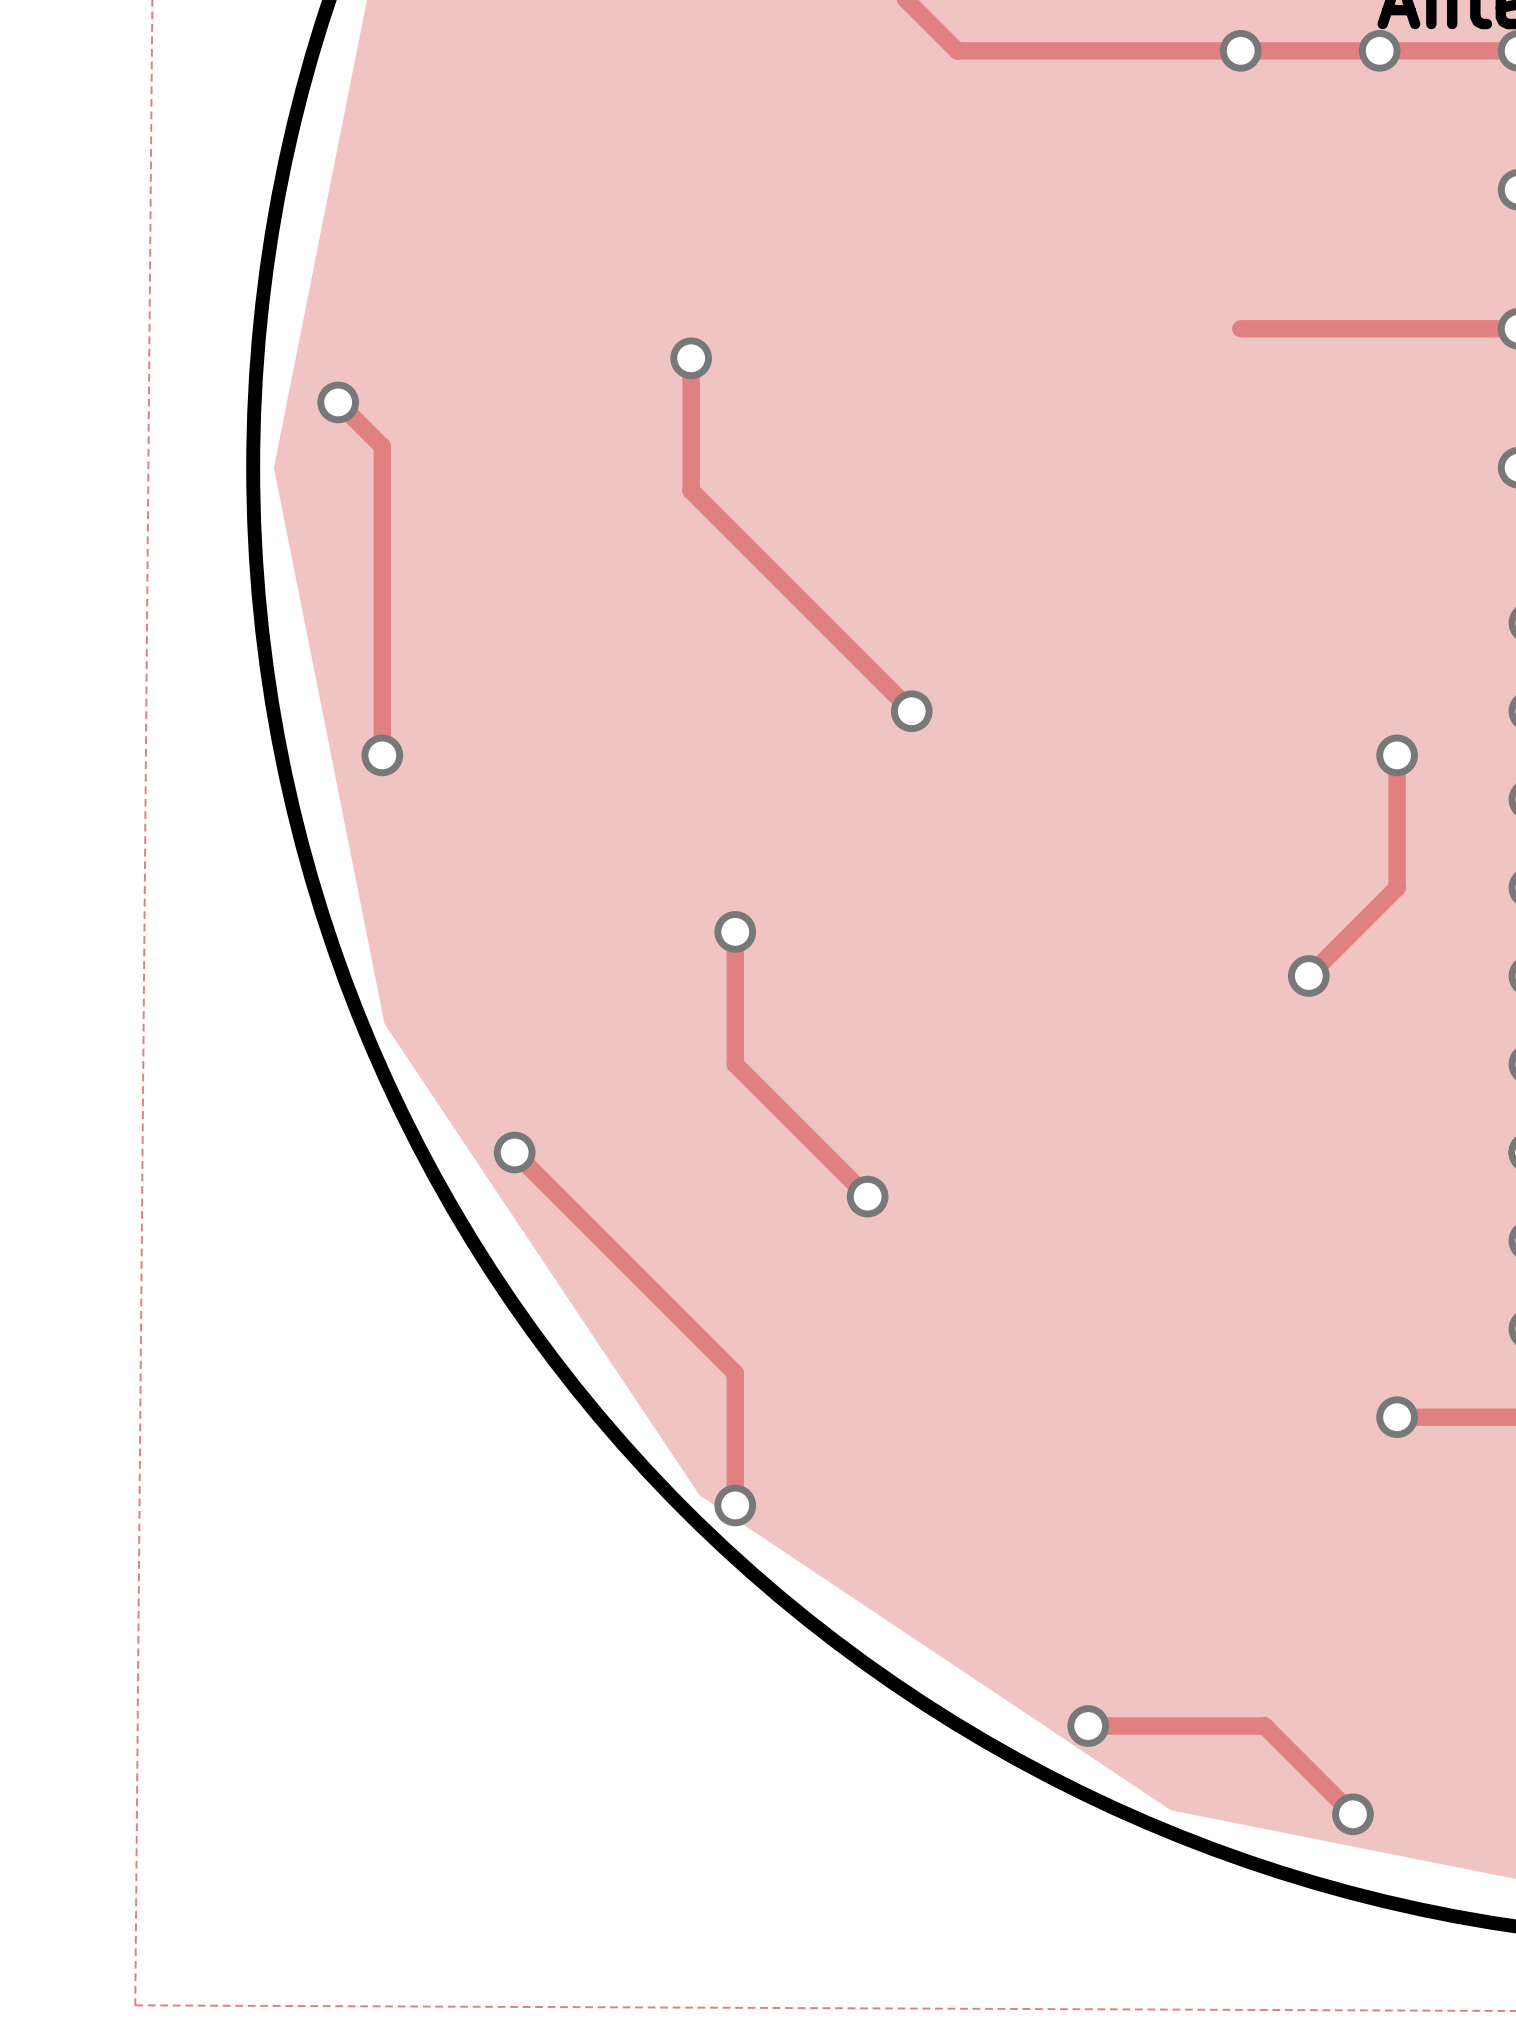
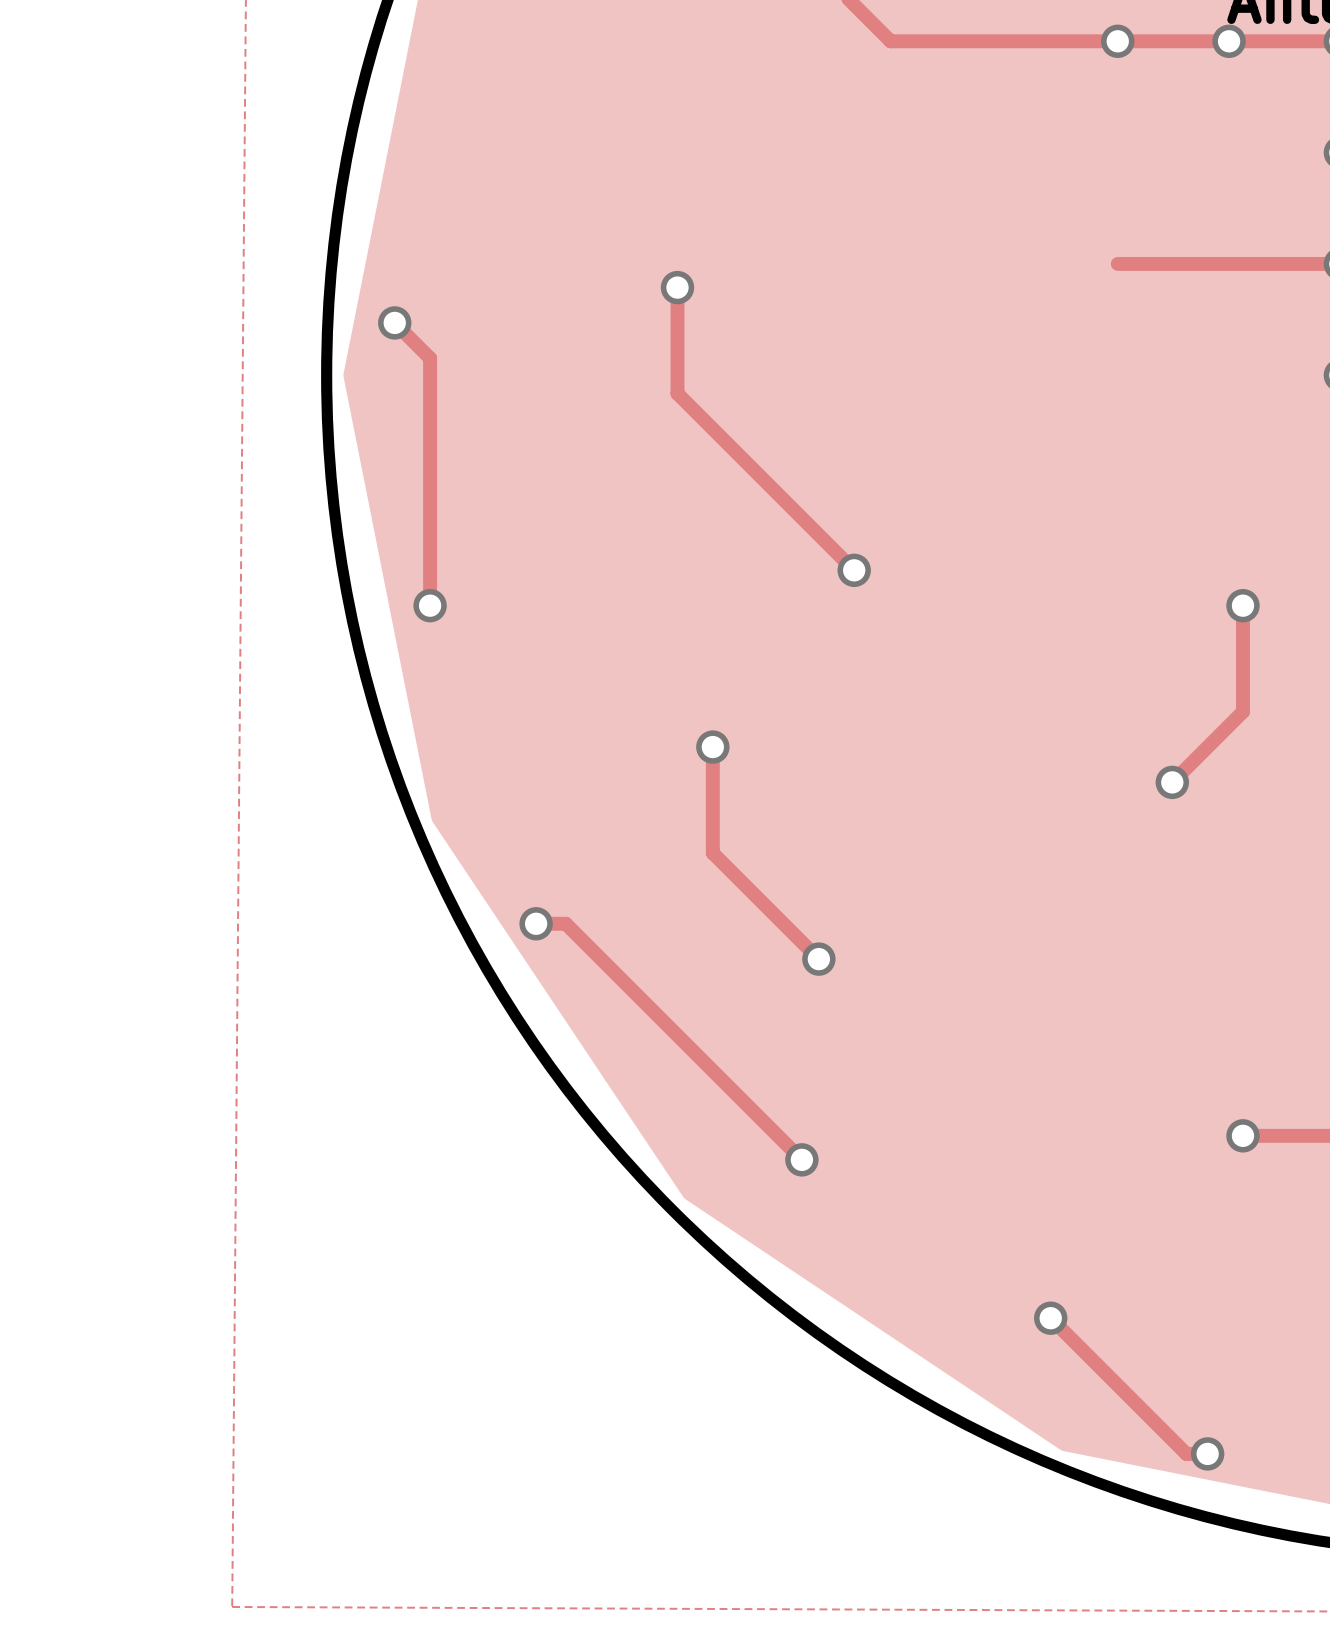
track: (514, 1152) (735, 1373) (735, 1505) -> (536, 923) (565, 923) (801, 1159)
via position: (735, 1505) -> (801, 1159)
track: (1088, 1726) (1264, 1726) (1352, 1814) -> (1050, 1318) (1186, 1453) (1207, 1453)
via position: (1088, 1726) -> (1050, 1318)

